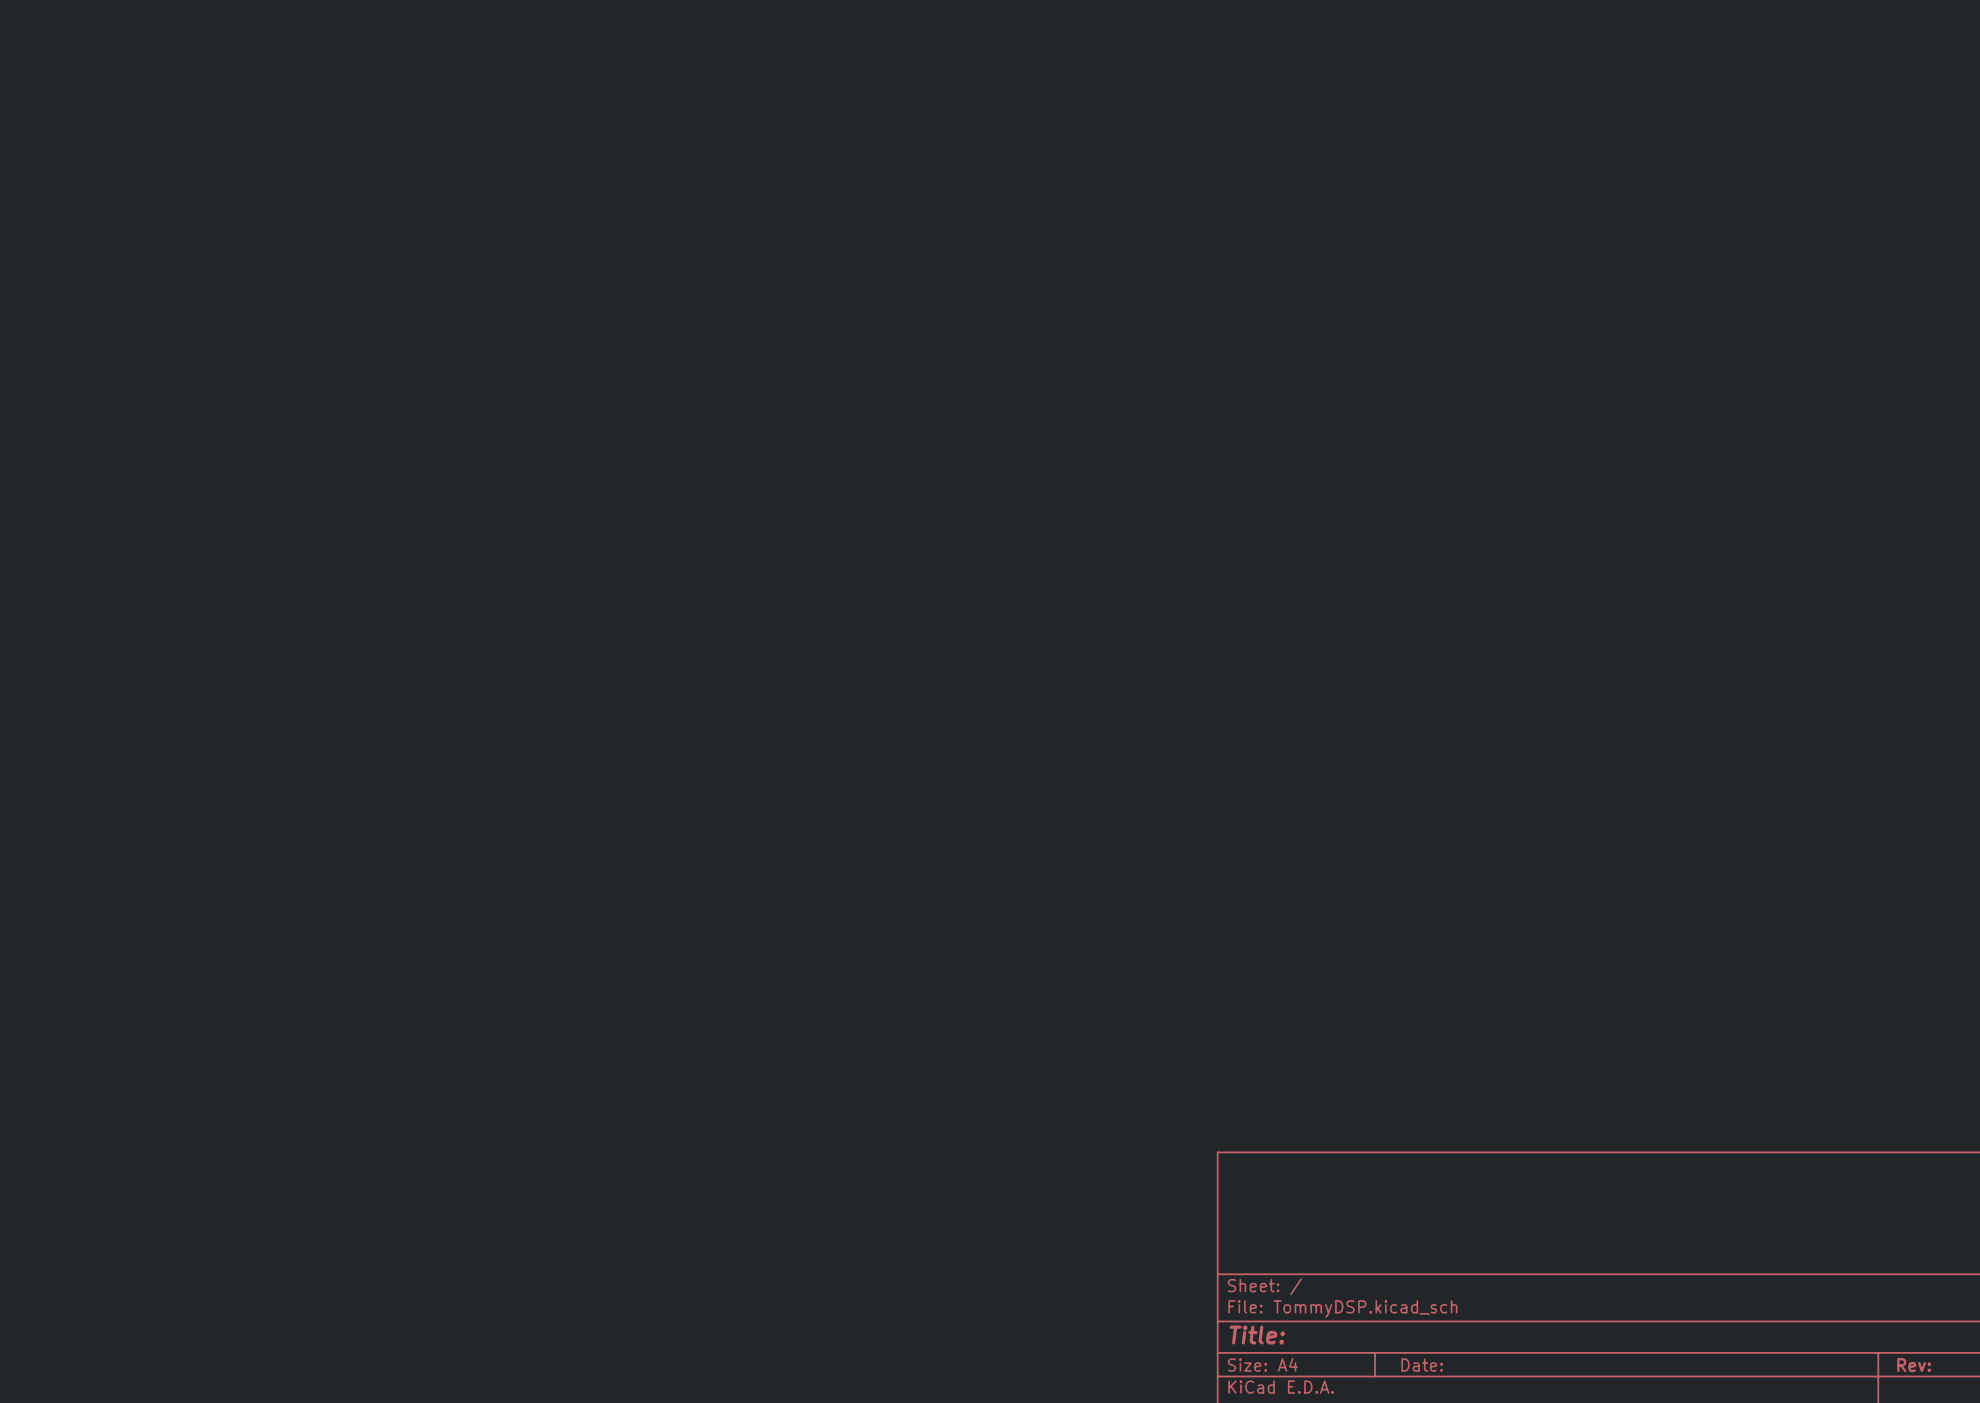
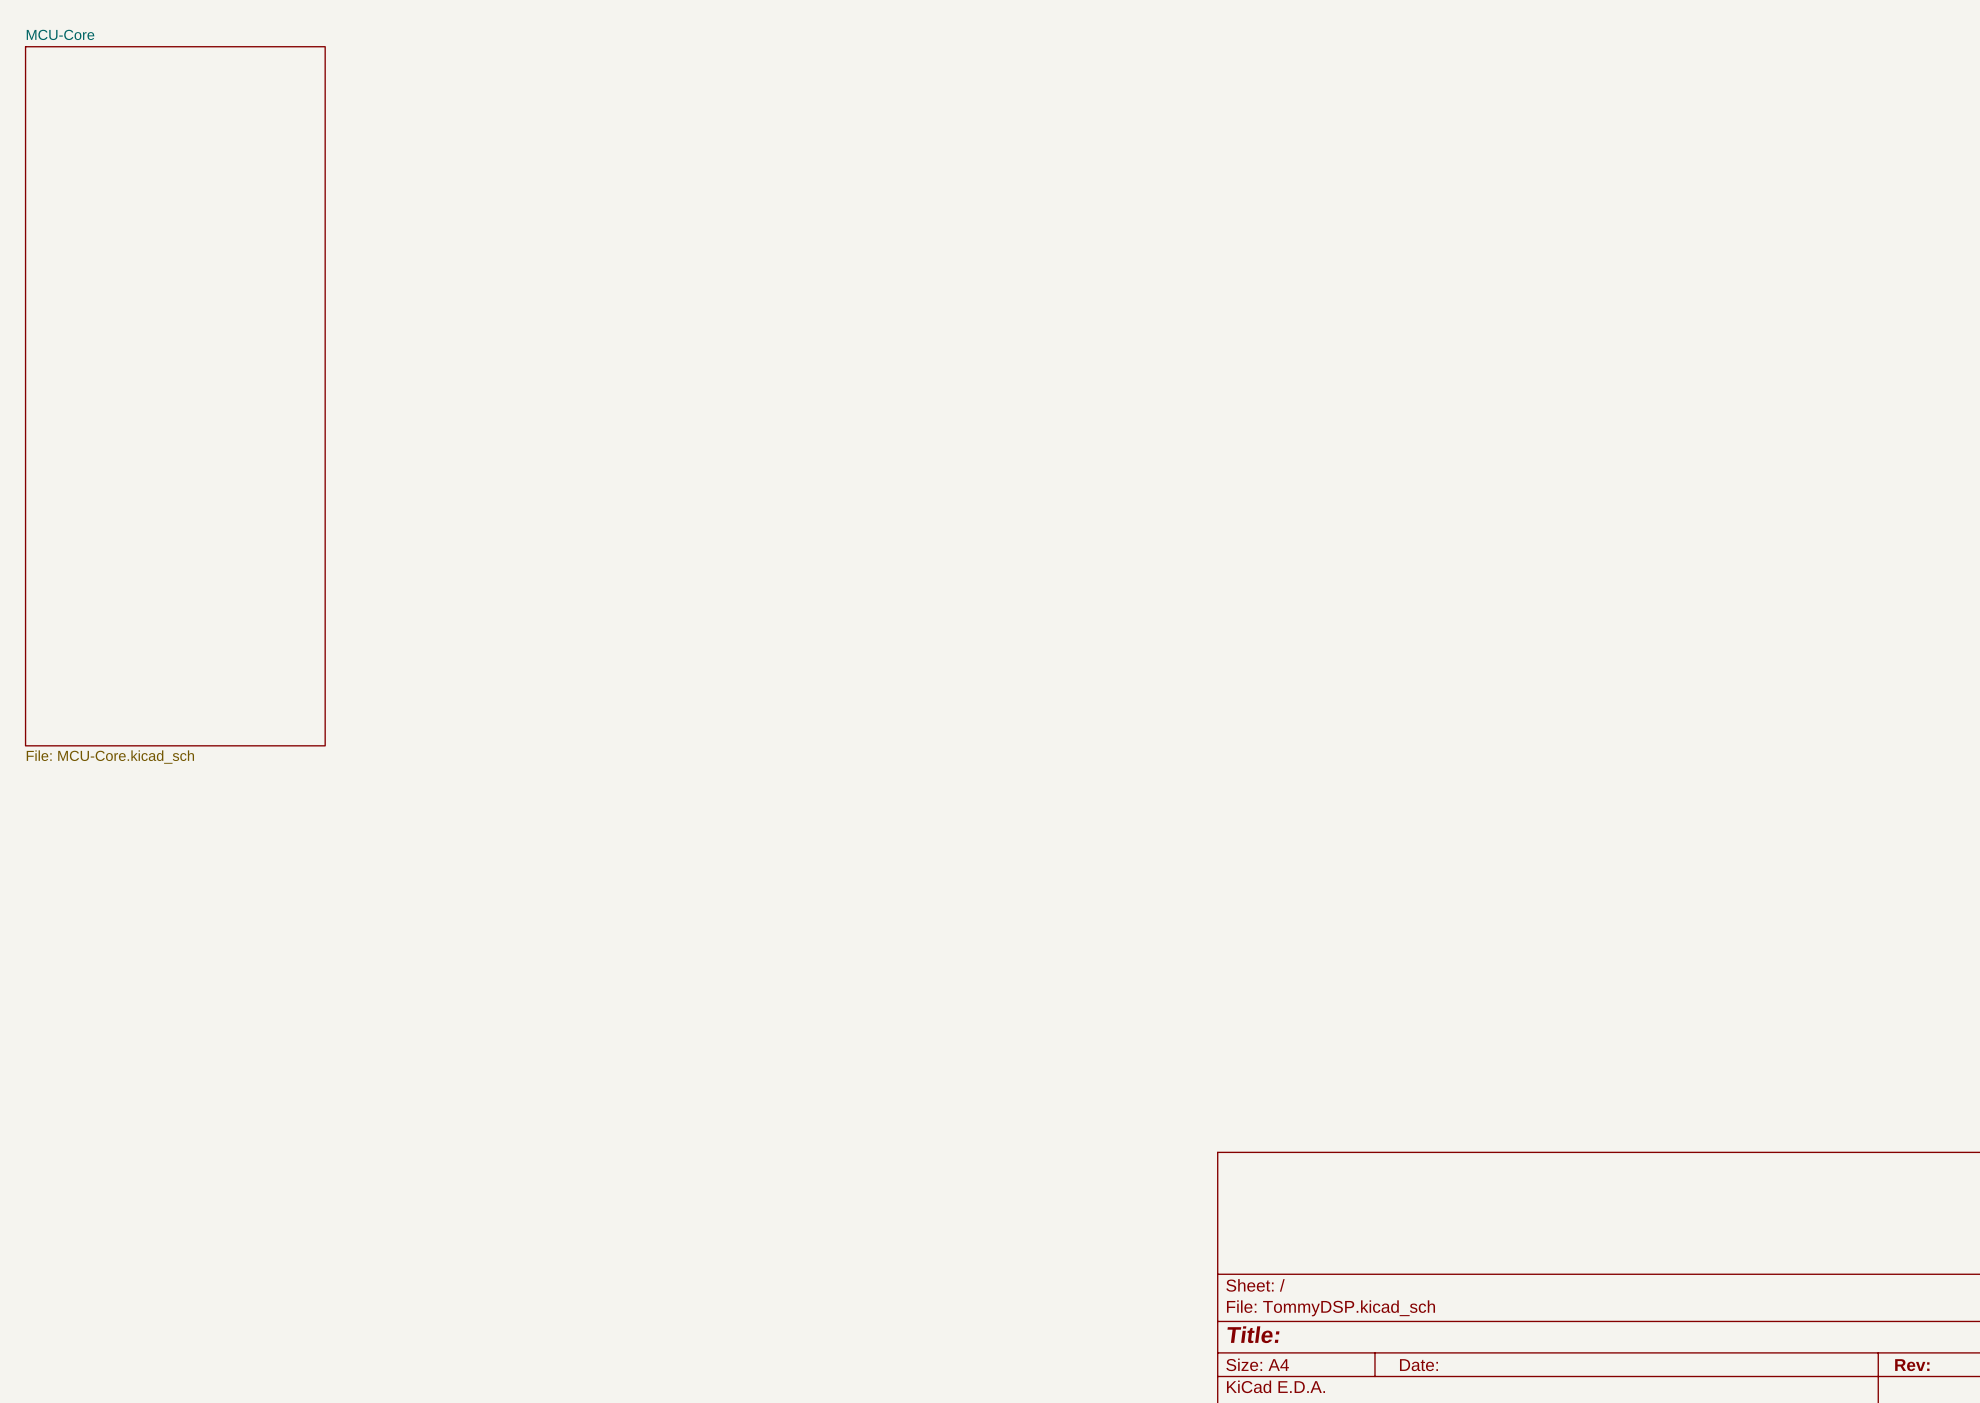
sheet MCU-Core: none -> File: MCU-Core.kicad_sch (175, 396)

